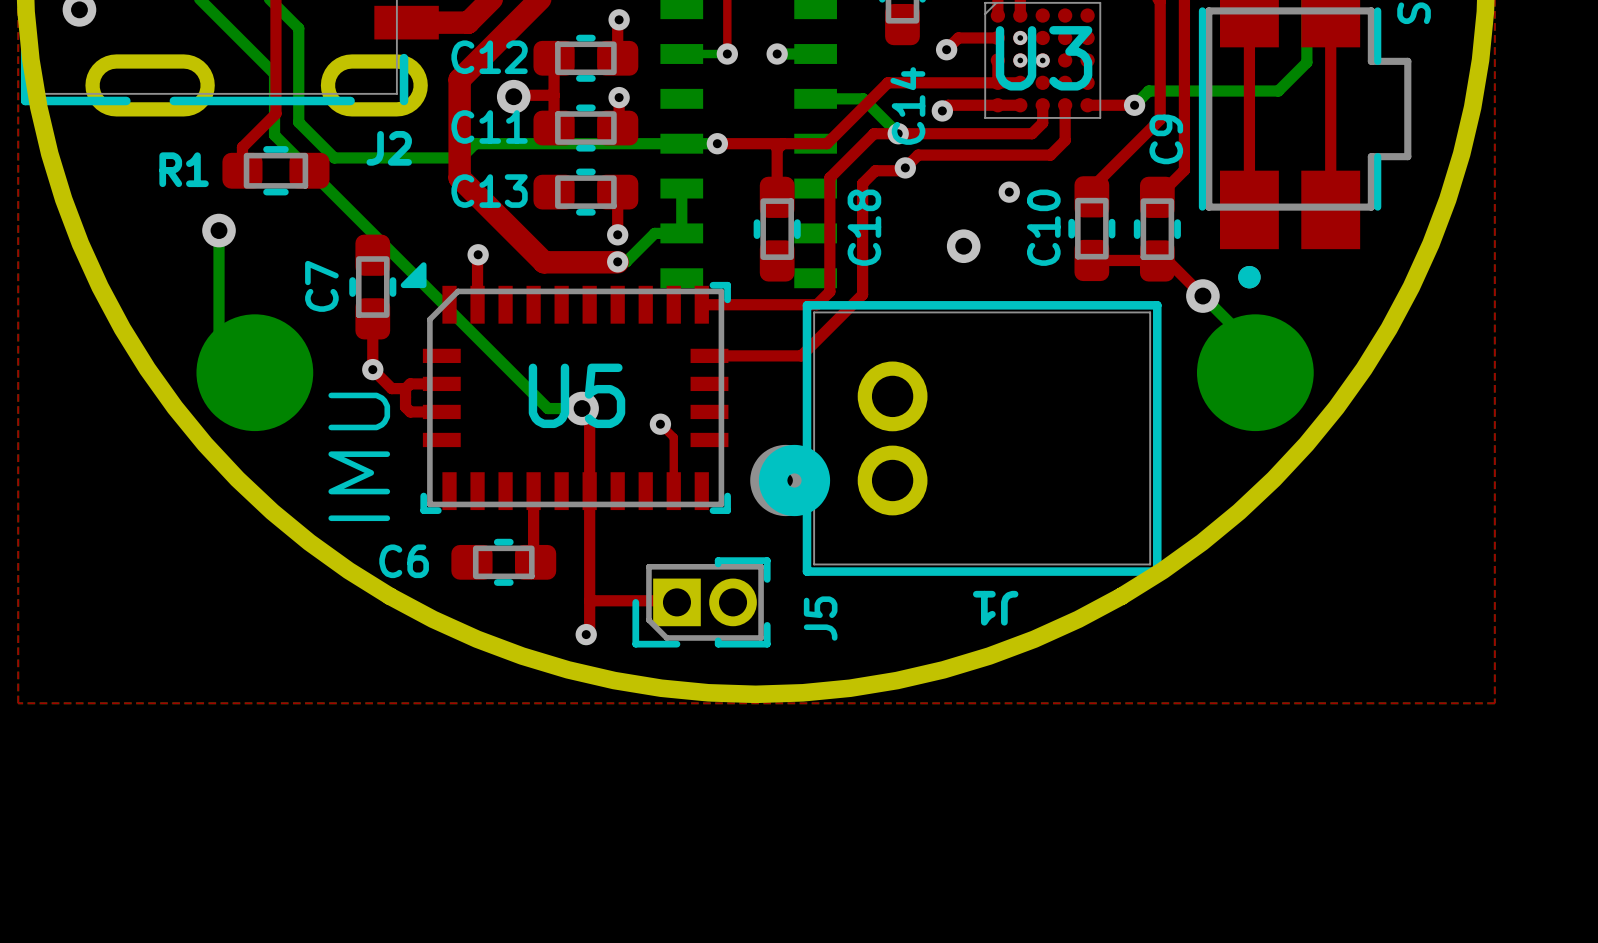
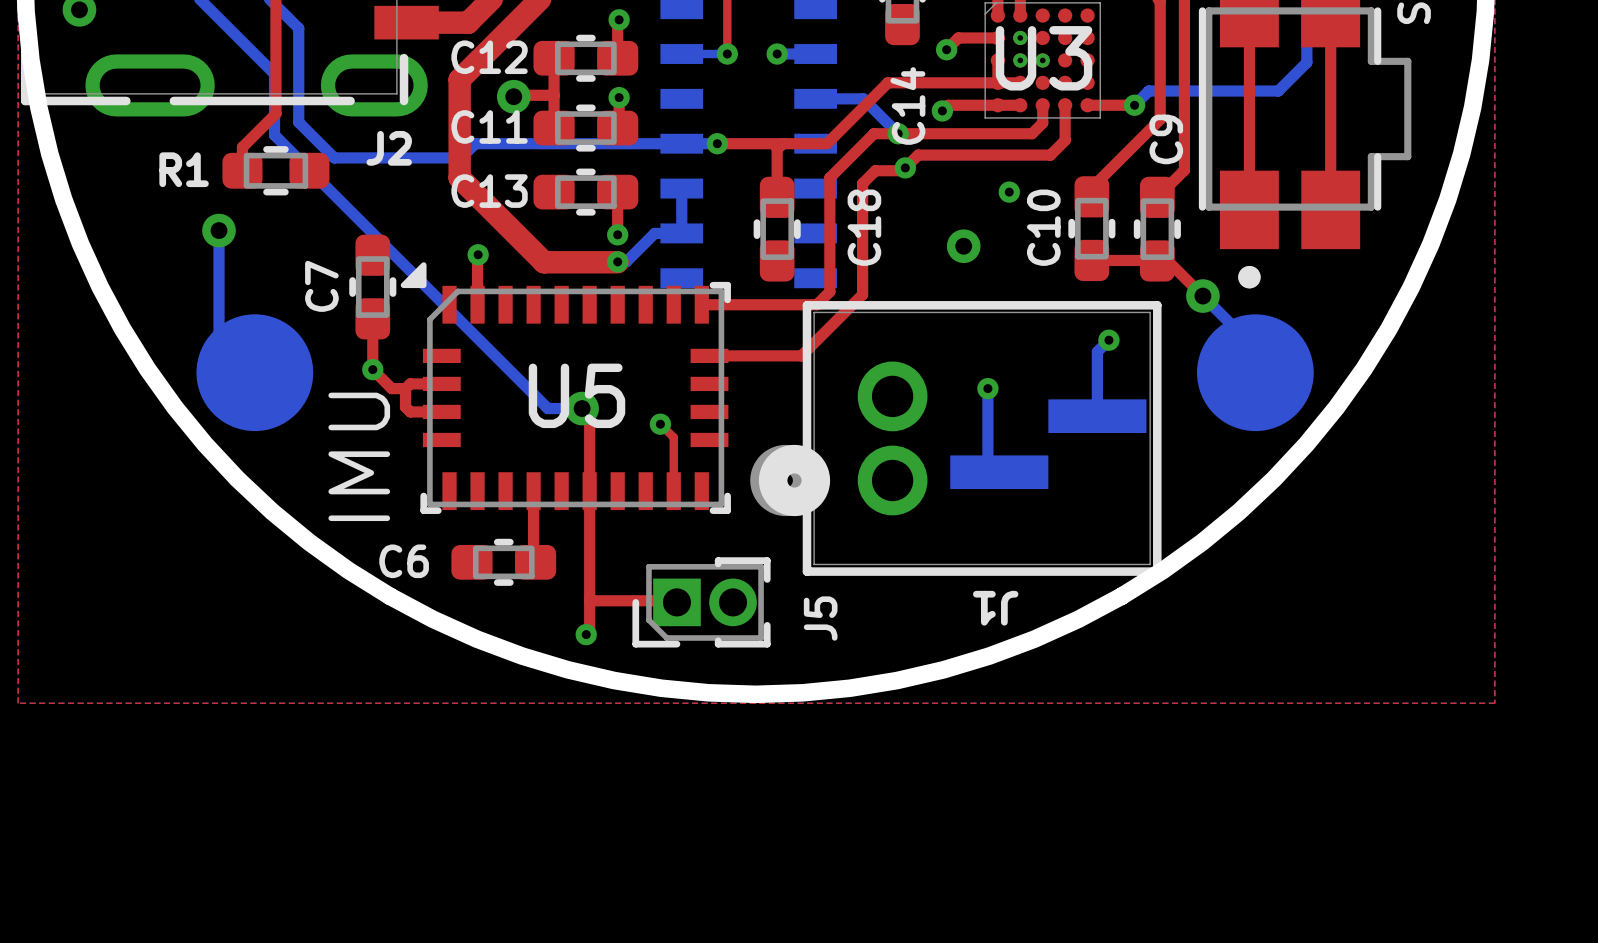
bottom track: none -> (1108, 340) (1097, 351) (1097, 416)
via: none -> (1108, 340)
bottom track: none -> (987, 388) (987, 460) (999, 472)
via: none -> (987, 388)
part: none -> (1048, 444)

